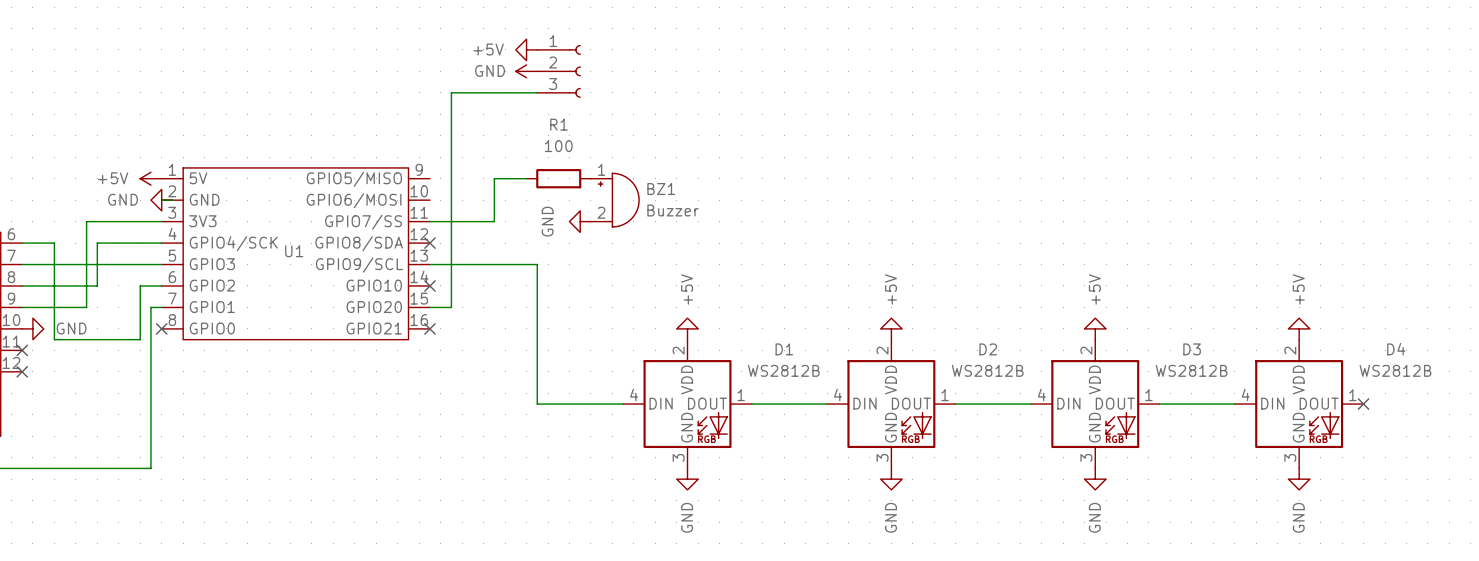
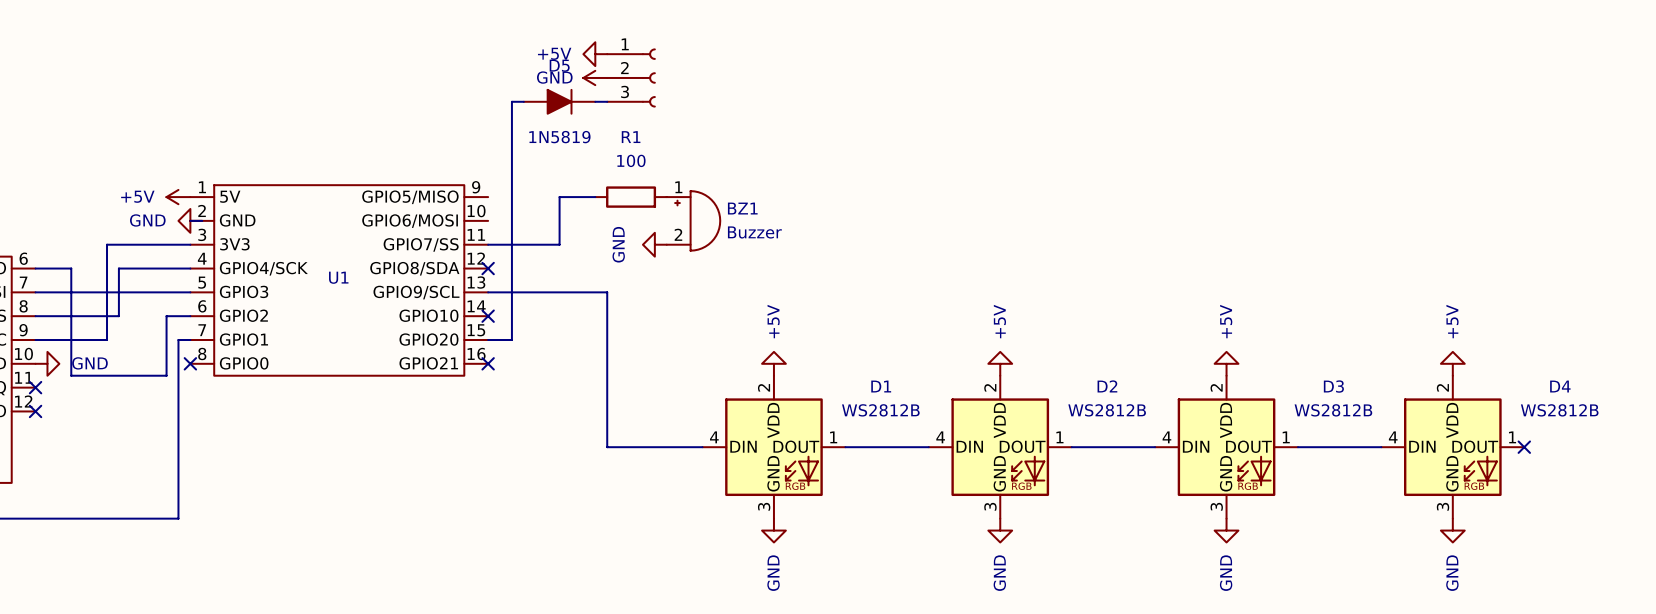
D5: none -> 1N5819 (559, 101)

